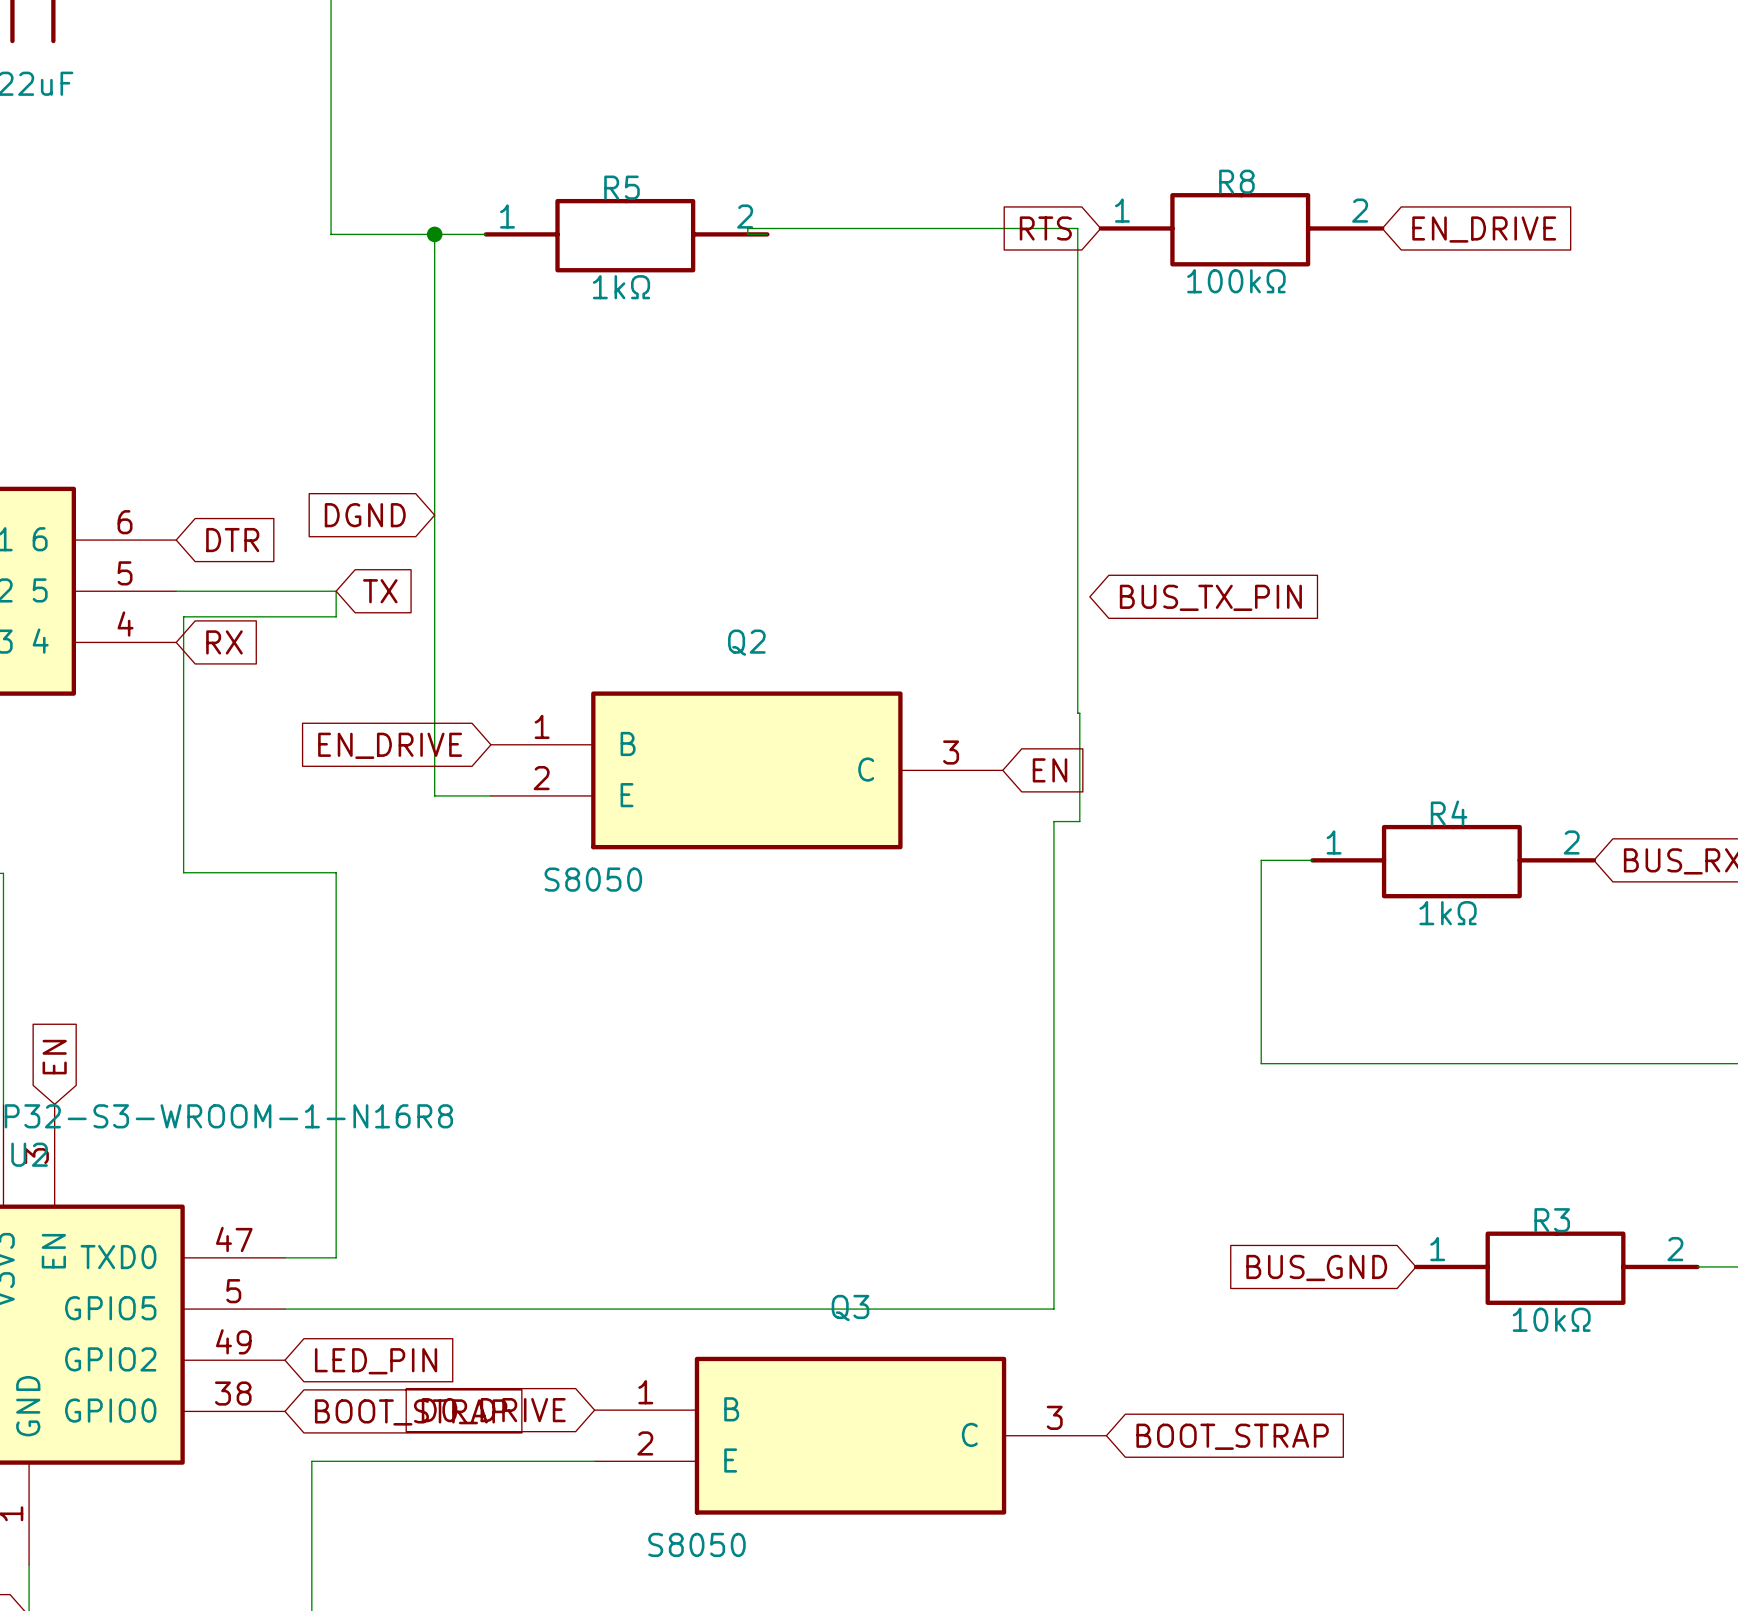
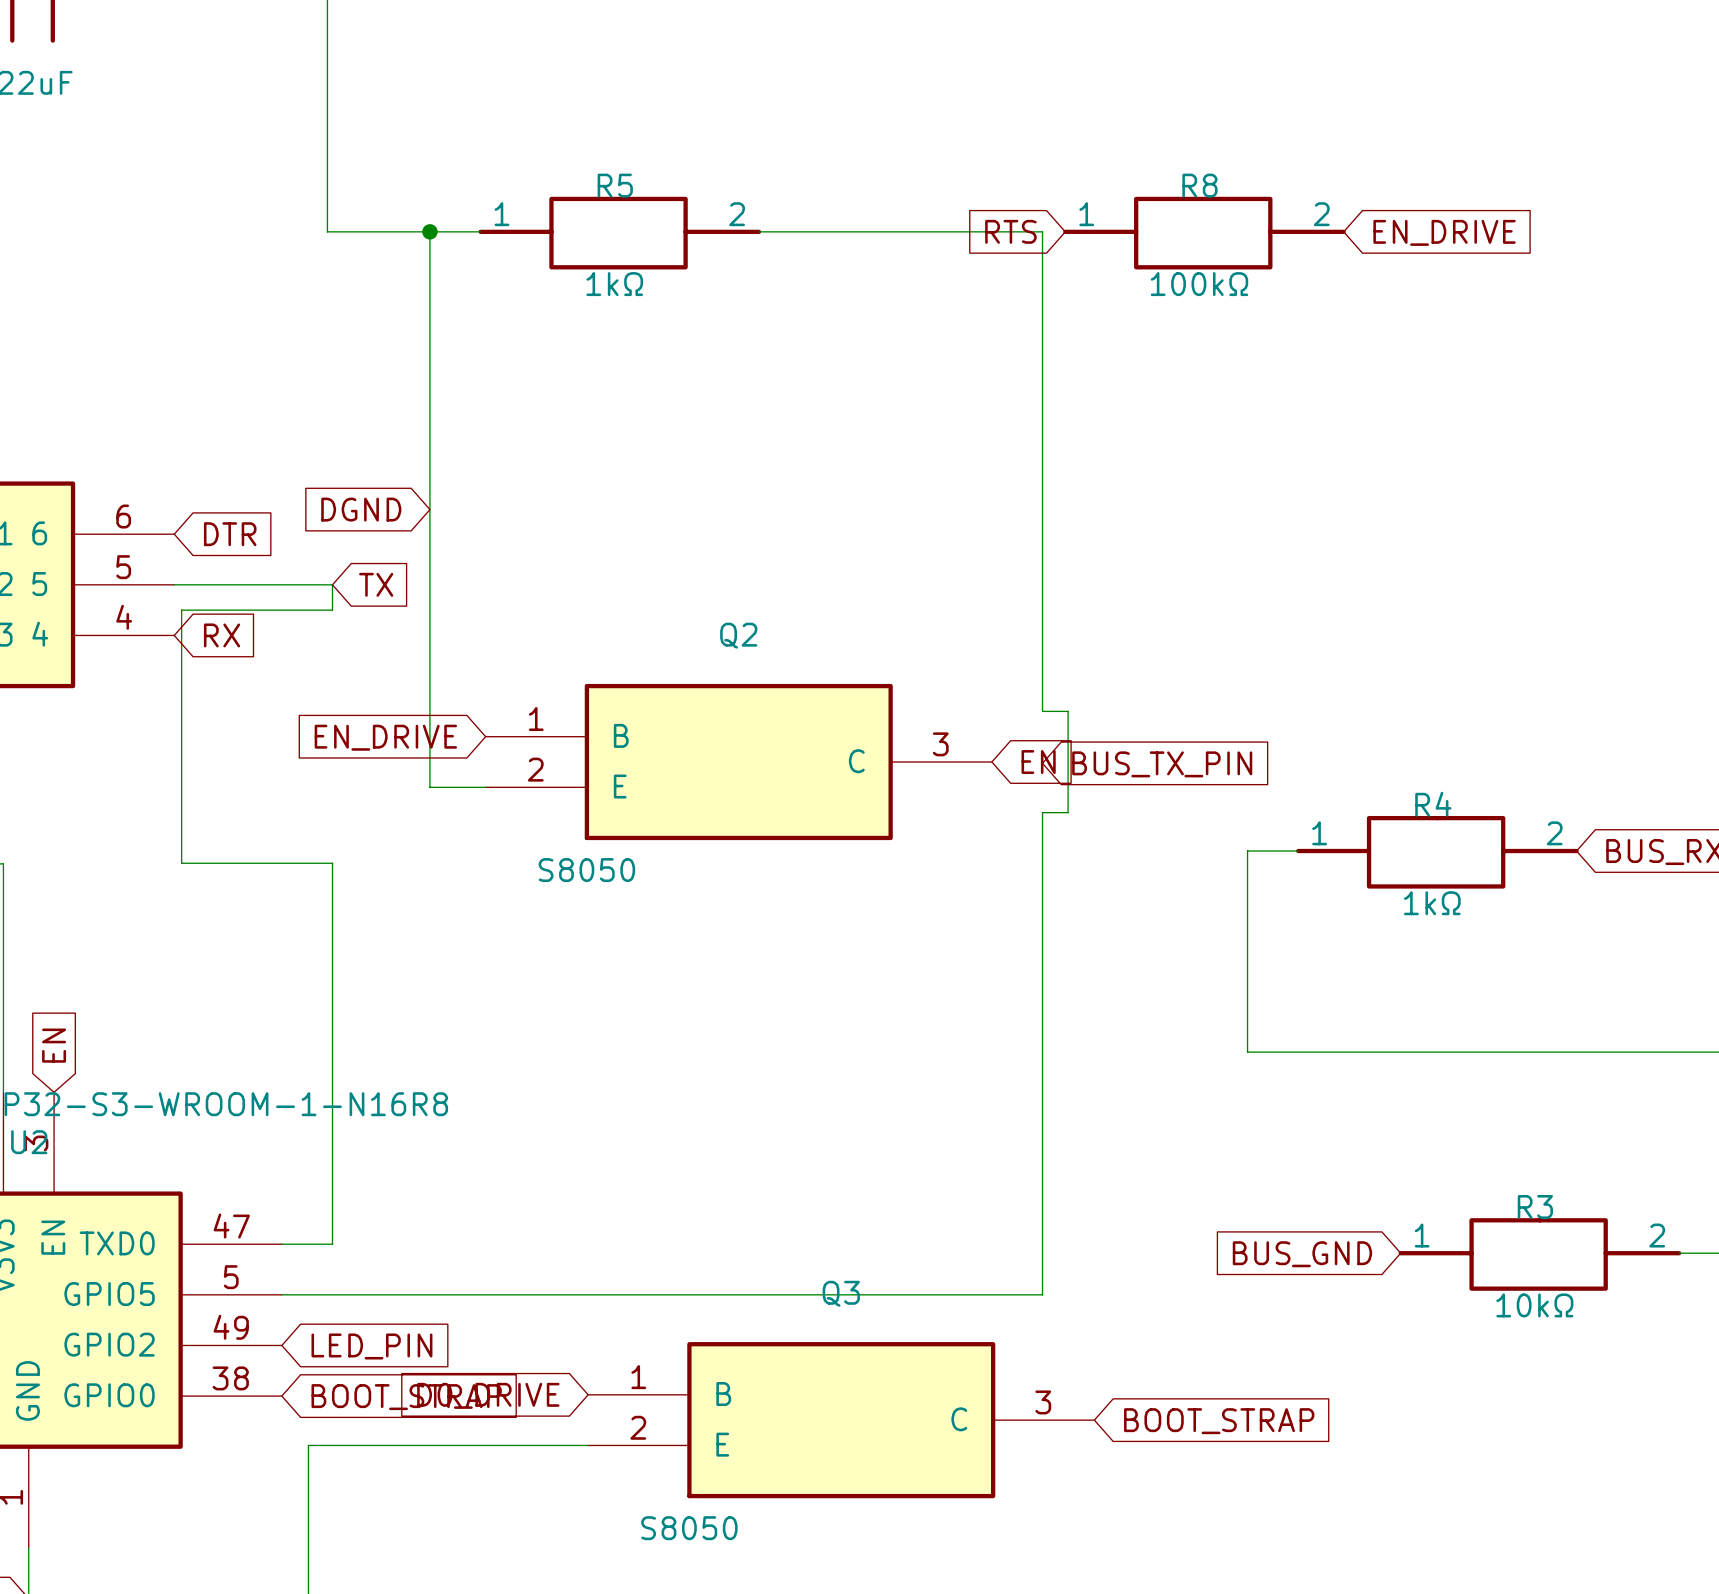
global label position: RTS (1045, 228) -> RTS (1010, 231)
R8 position: (1241, 229) -> (1204, 233)
global label position: EN_DRIVE (1484, 229) -> EN_DRIVE (1444, 232)
wire: (767, 234) (747, 234) (747, 228) (1077, 228) (1077, 713) (1079, 713) (1079, 719) -> (759, 231) (1042, 231) (1042, 711) (1068, 711)
global label position: BUS_TX_PIN (1210, 597) -> BUS_TX_PIN (1162, 764)

